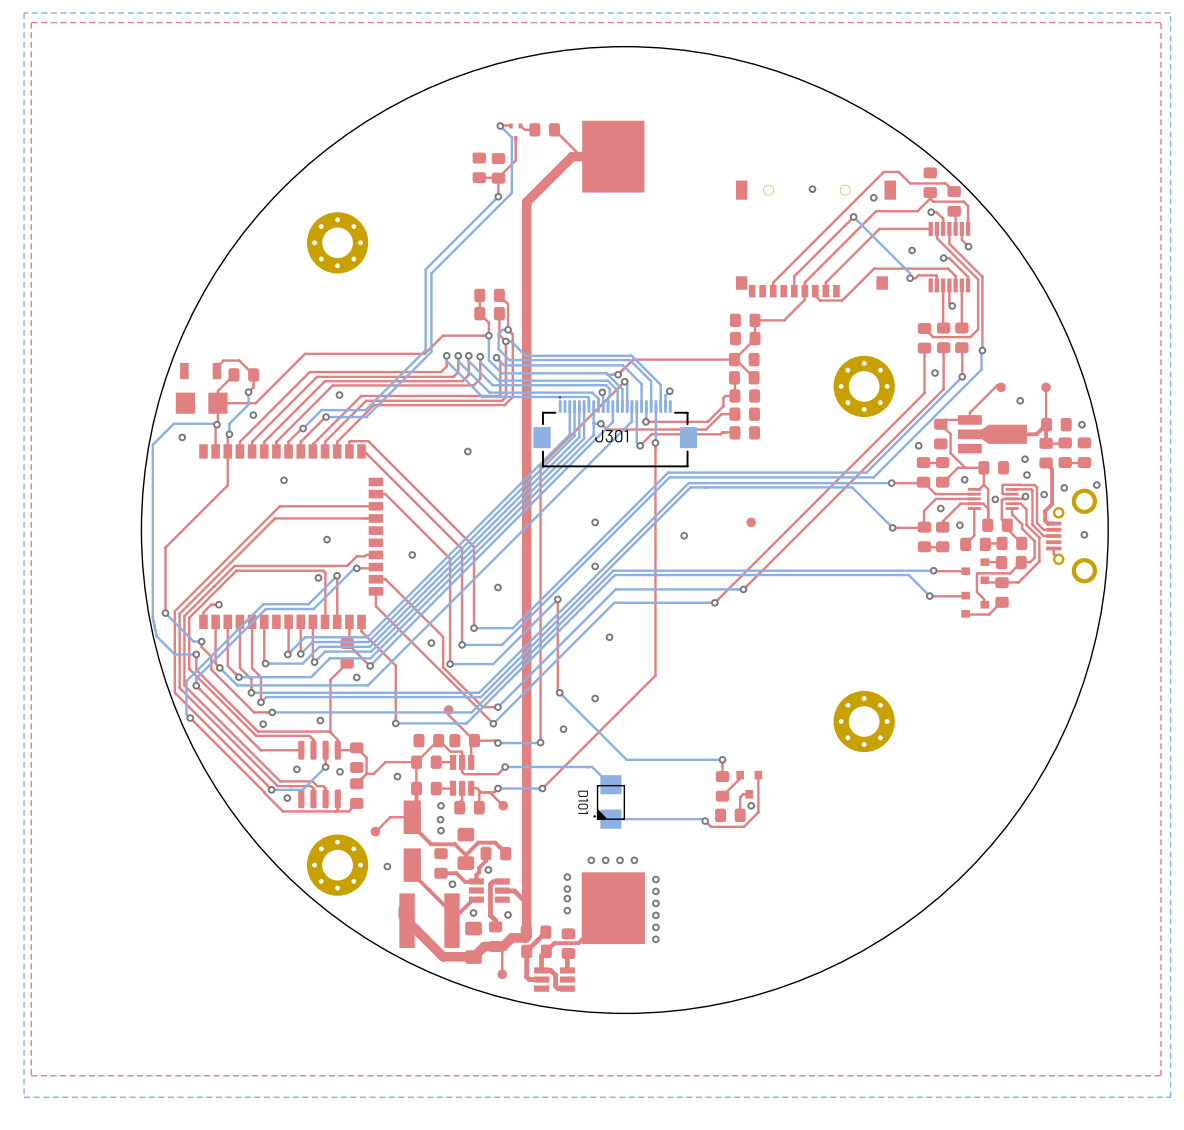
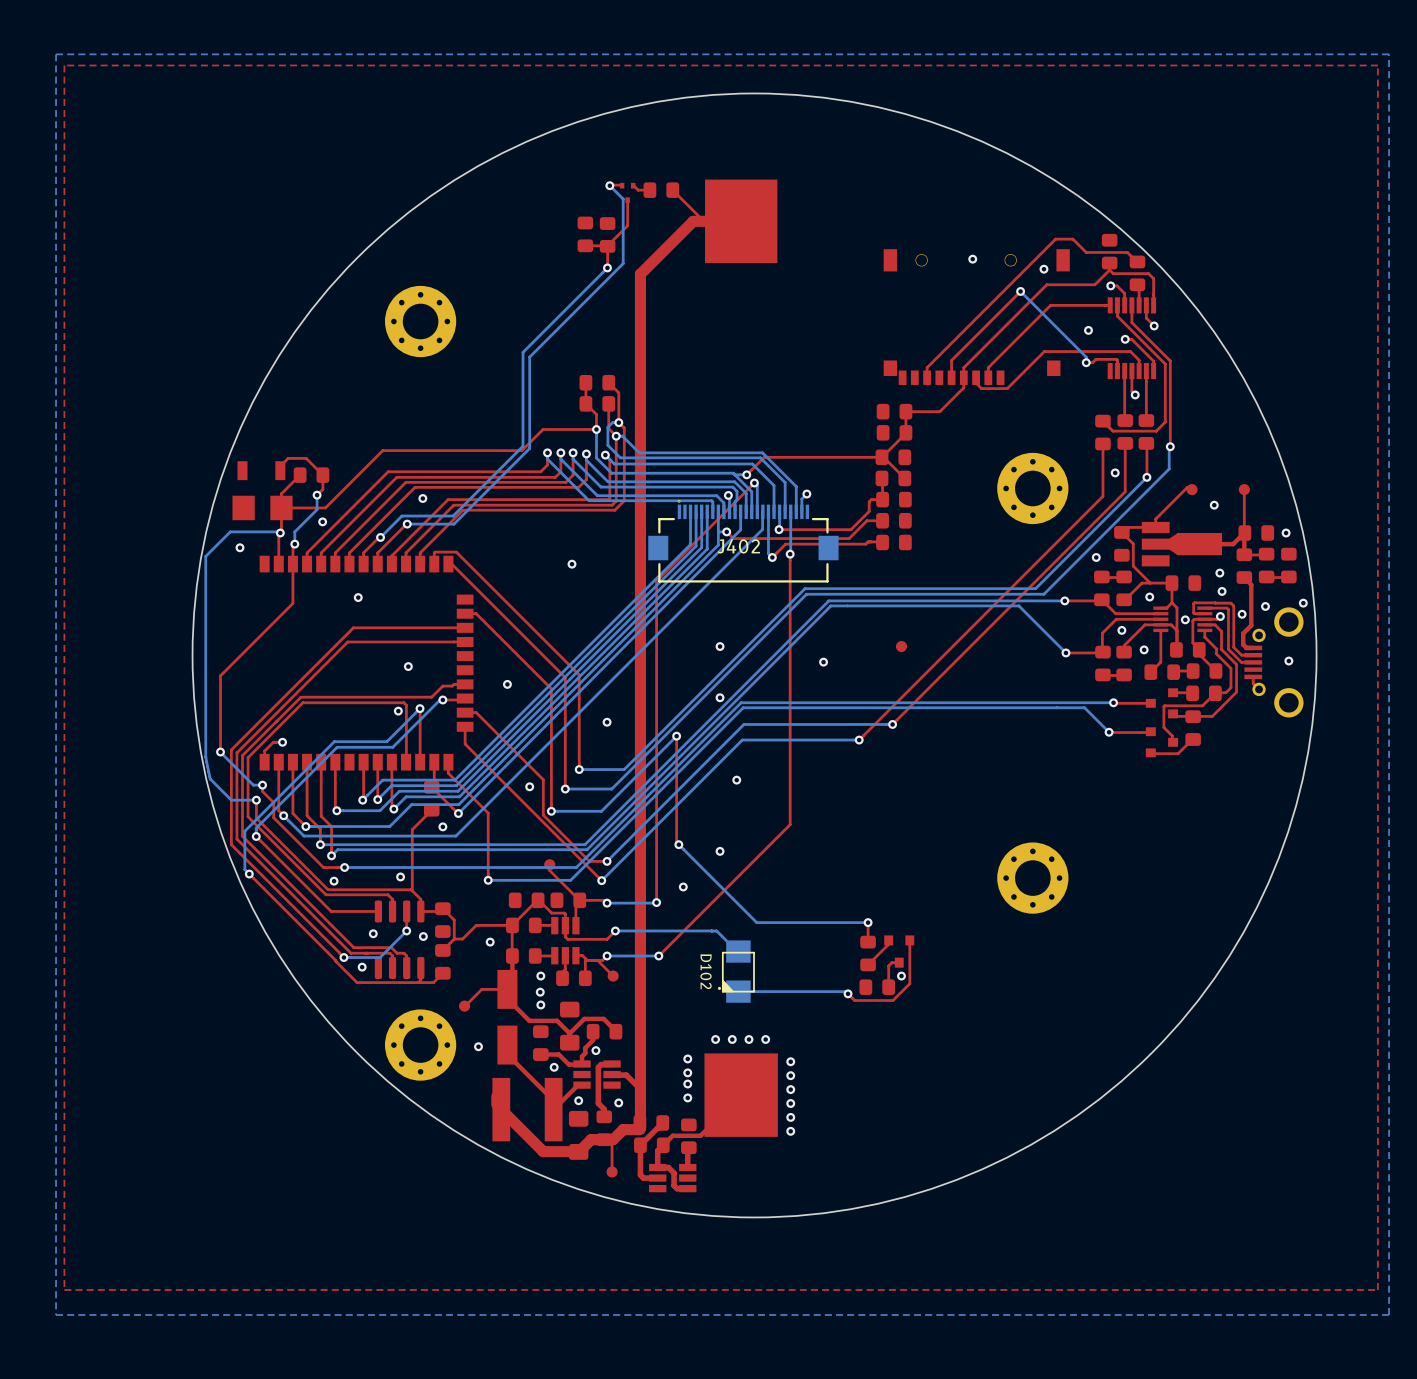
J301 name: J301 (611, 436) -> J402 (738, 546)
D101 name: D101 (583, 802) -> D102 (706, 971)

